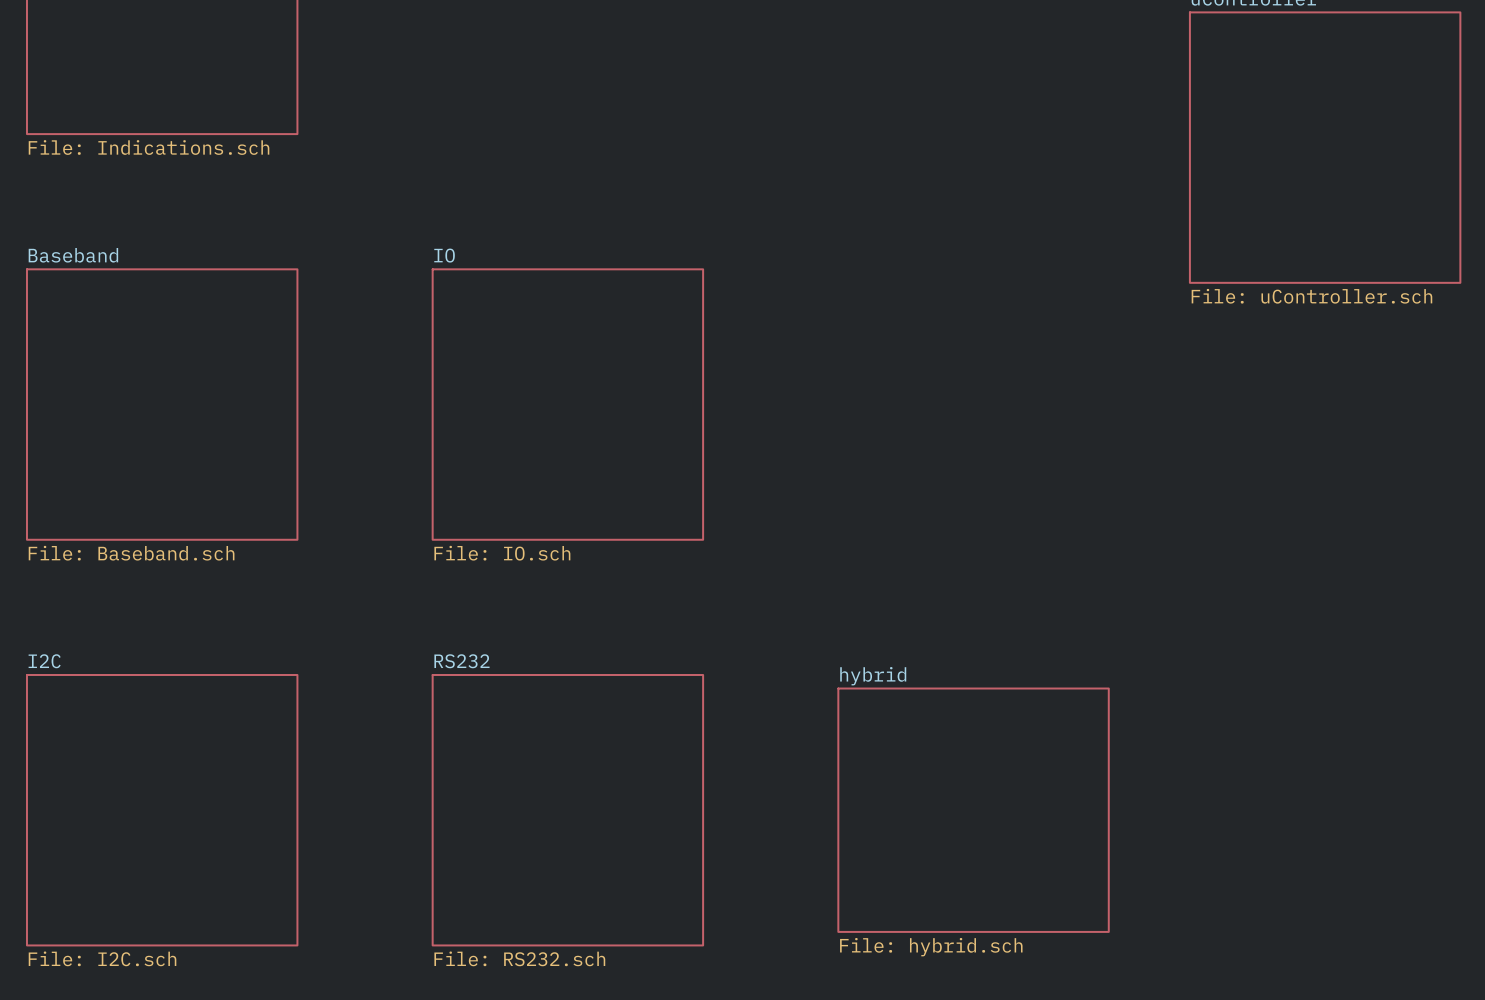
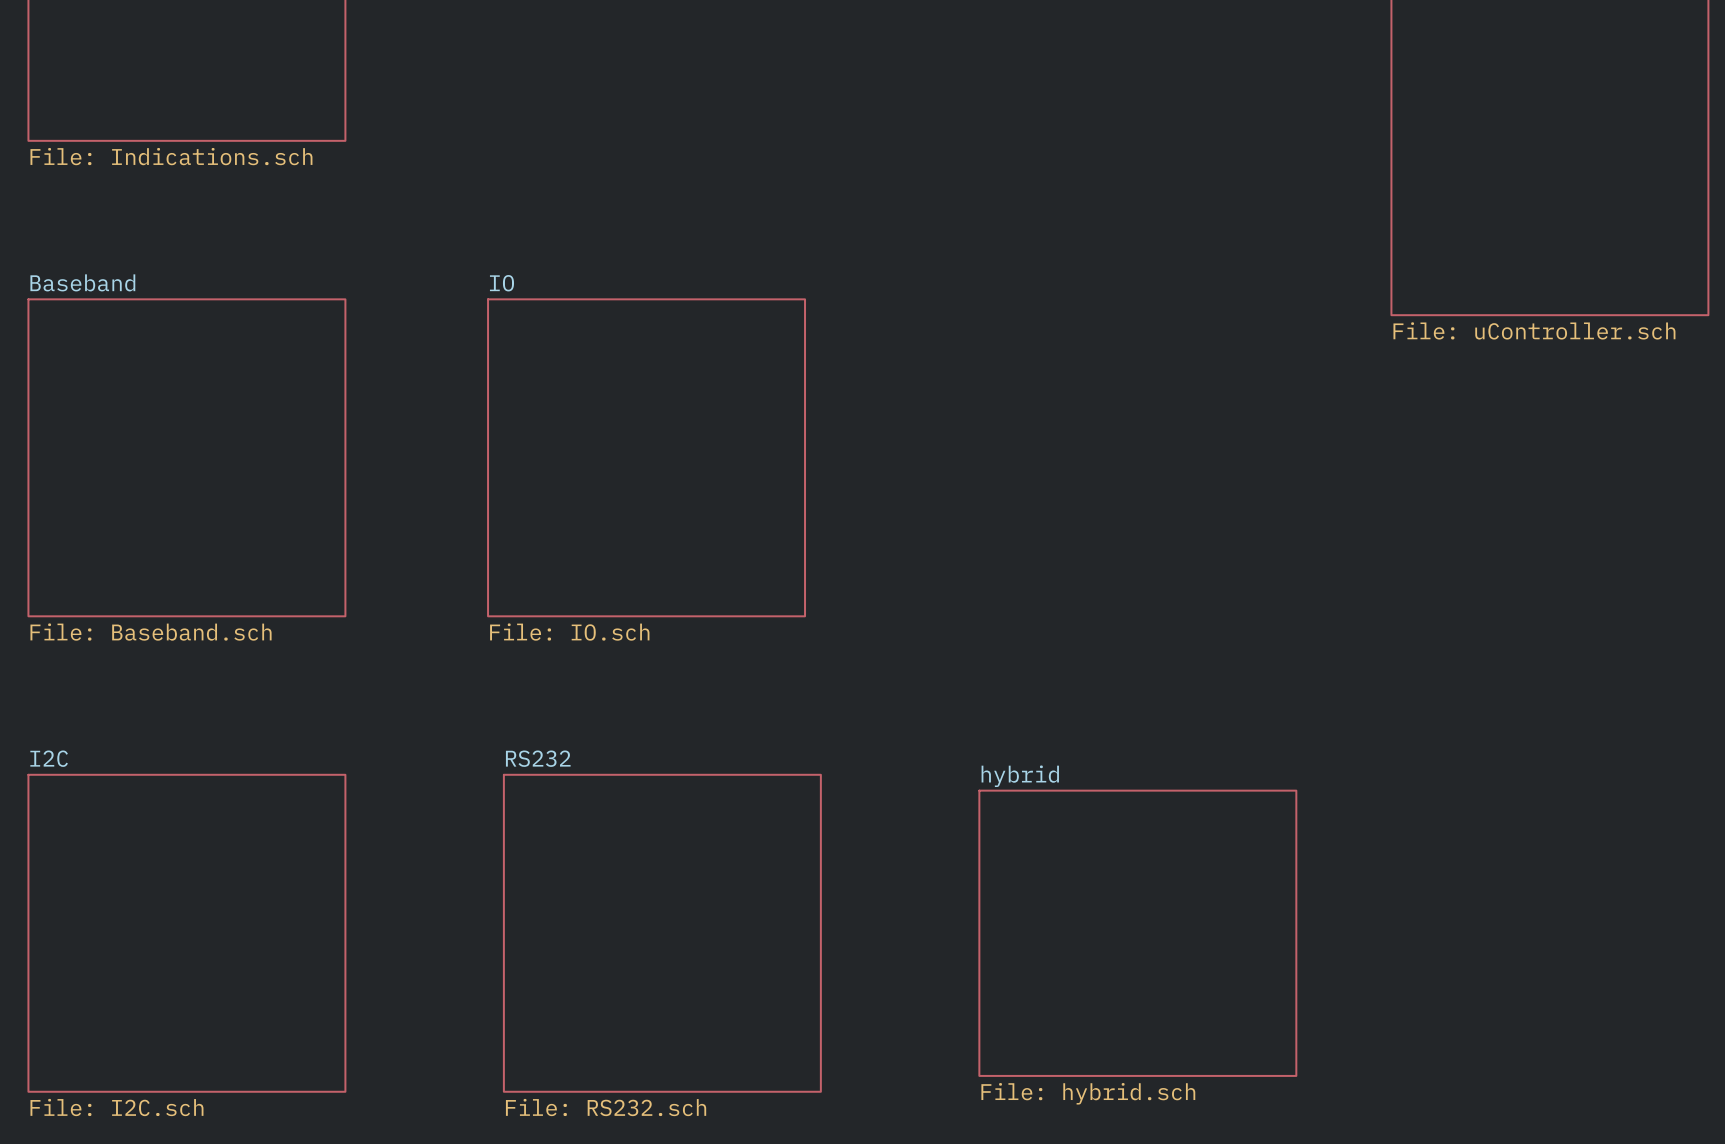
sheet IO position: (567, 404) -> (646, 457)

